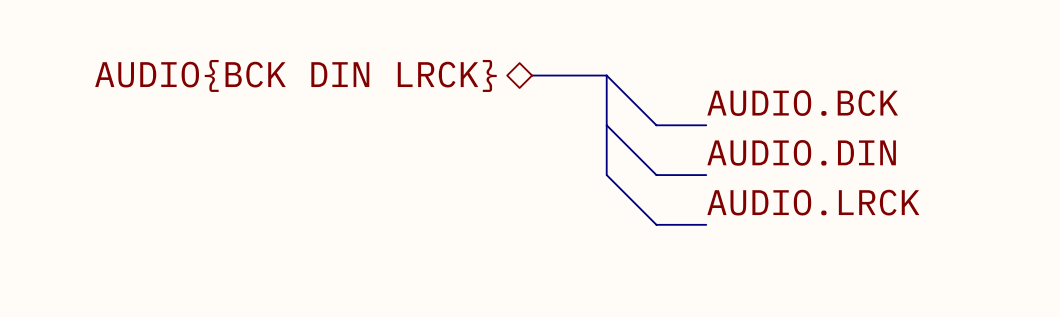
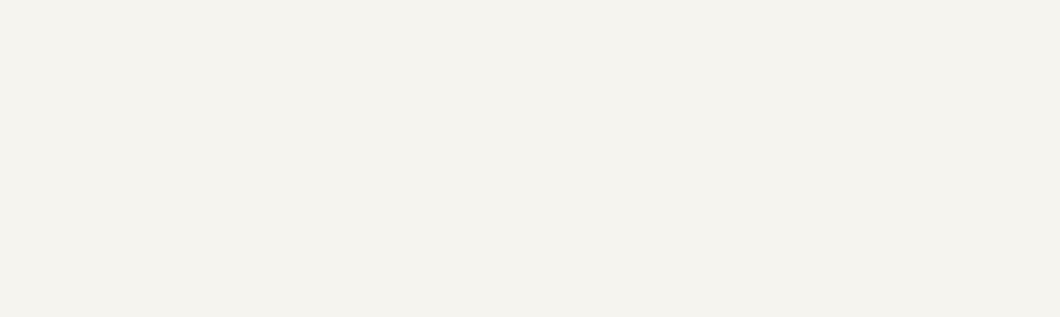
hierarchical label: AUDIO{BCK DIN LRCK} (295, 75) -> none
bus: (532, 75) (606, 75) (606, 175) -> none
wire: (606, 75) (656, 125) (706, 125) -> none
label: AUDIO.BCK (802, 103) -> none
wire: (606, 125) (656, 175) (706, 175) -> none
label: AUDIO.DIN (801, 152) -> none
wire: (606, 175) (656, 224) (706, 224) -> none
label: AUDIO.LRCK (813, 202) -> none

